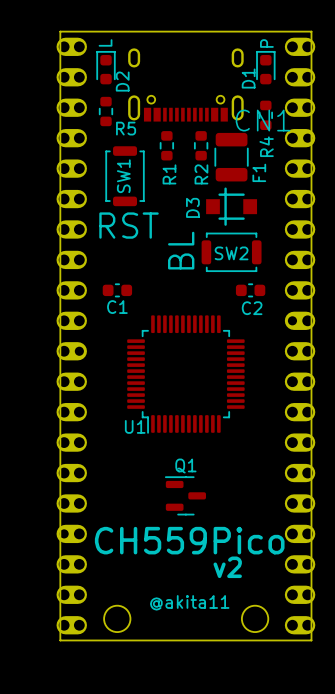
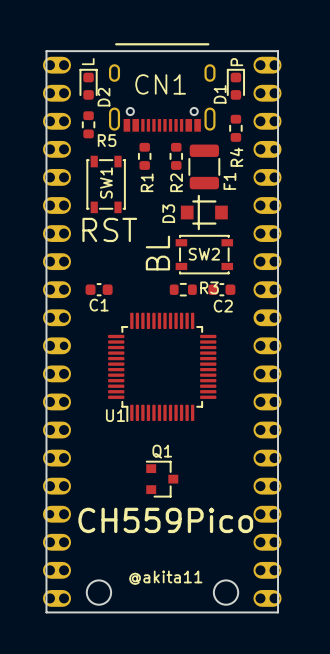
CN1 footprint: [128, 48, 244, 122] -> [108, 43, 216, 132]
CN1 name position: CN1 (263, 120) -> CN1 (160, 84)
SW1 footprint: [105, 146, 145, 207] -> [86, 155, 126, 214]
SW2 footprint: [201, 232, 262, 272] -> [175, 235, 234, 275]
R3: none -> (183, 289)
Q1 footprint: [165, 476, 206, 516] -> [146, 461, 179, 498]
text: v2 (227, 567) -> none

